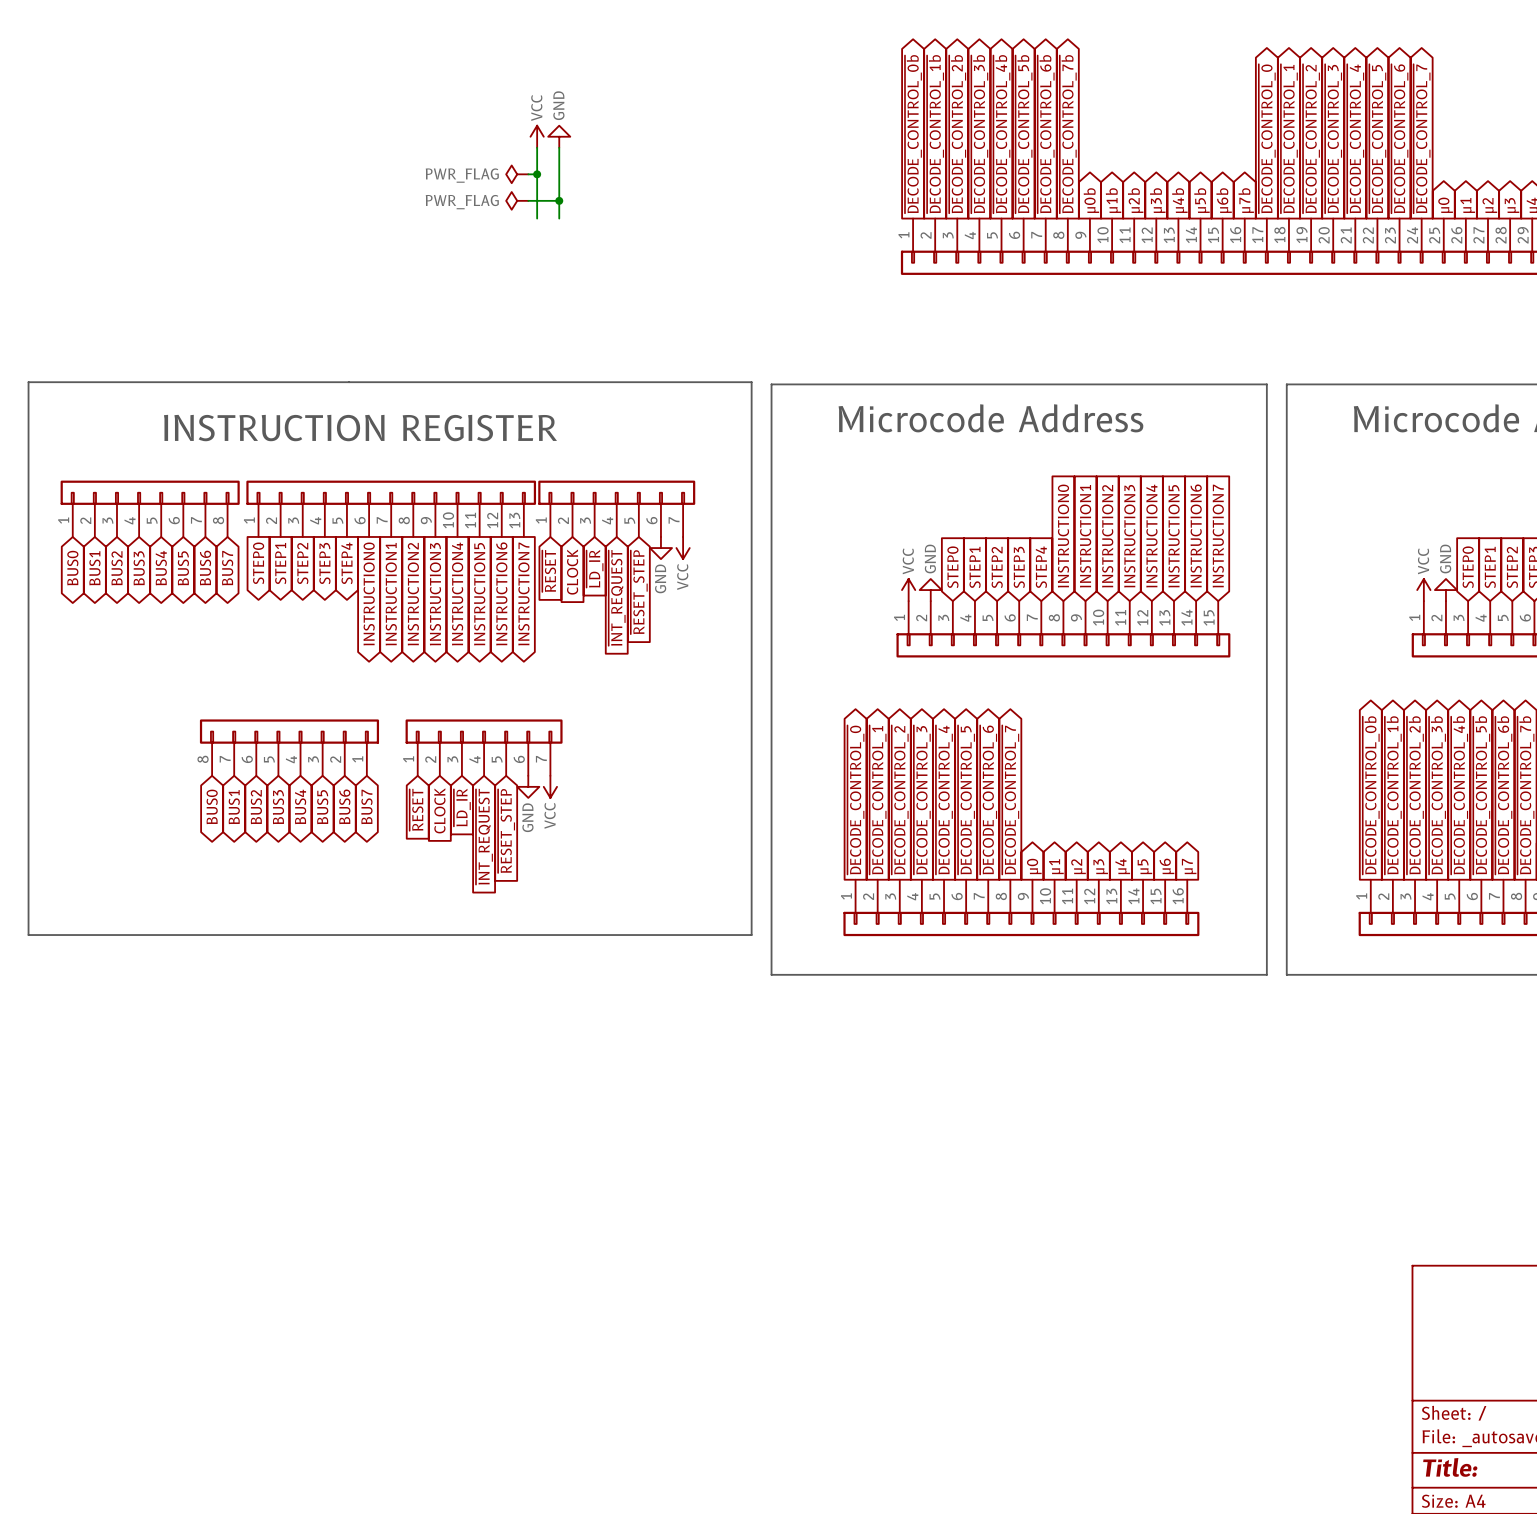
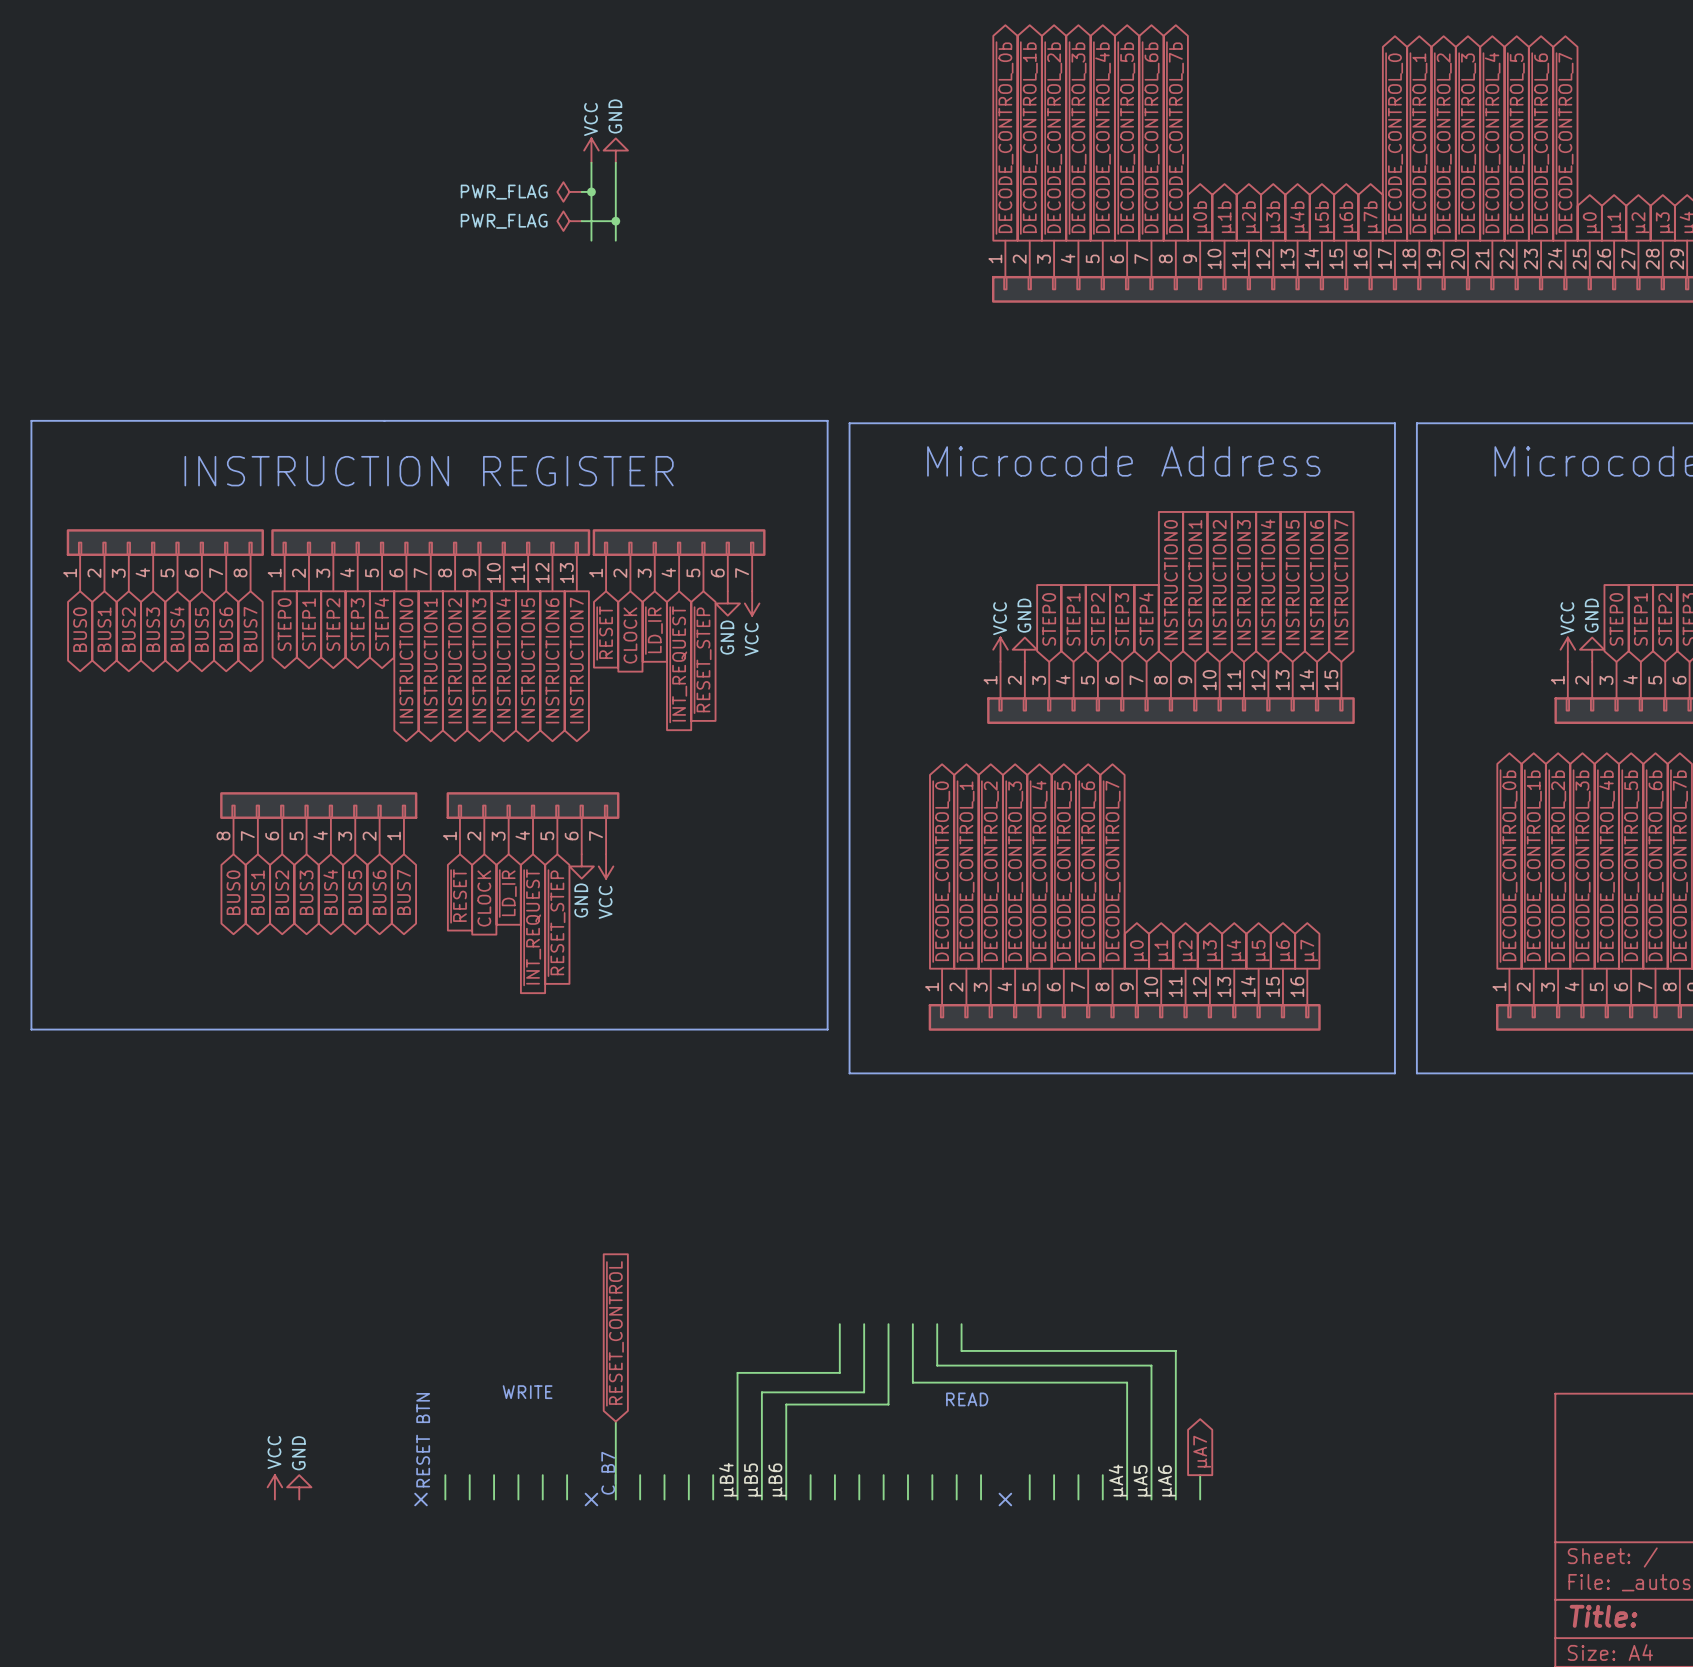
wire: none -> (839, 1324) (839, 1372) (737, 1372) (737, 1499)
wire: none -> (864, 1324) (864, 1392) (761, 1392) (761, 1499)
wire: none -> (888, 1324) (888, 1404) (786, 1404) (786, 1499)
wire: none -> (912, 1324) (912, 1382) (1127, 1382) (1127, 1499)
wire: none -> (937, 1324) (937, 1365) (1151, 1365) (1151, 1499)
wire: none -> (961, 1324) (961, 1350) (1175, 1350) (1175, 1499)
global label: none -> ~{RESET_CONTROL} (614, 1333)
text: none -> WRITE (527, 1392)
text: none -> READ (967, 1399)
wire: none -> (615, 1421) (615, 1499)
text: none -> RESET BTN (423, 1440)
global label: none -> μA7 (1202, 1451)
wire: none -> (445, 1475) (445, 1499)
wire: none -> (469, 1475) (469, 1499)
wire: none -> (494, 1475) (494, 1499)
wire: none -> (518, 1475) (518, 1499)
wire: none -> (542, 1475) (542, 1499)
wire: none -> (567, 1475) (567, 1499)
wire: none -> (640, 1475) (640, 1499)
wire: none -> (664, 1475) (664, 1499)
wire: none -> (688, 1475) (688, 1499)
wire: none -> (713, 1475) (713, 1499)
wire: none -> (810, 1475) (810, 1499)
wire: none -> (834, 1475) (834, 1499)
wire: none -> (859, 1475) (859, 1499)
wire: none -> (883, 1475) (883, 1499)
wire: none -> (907, 1475) (907, 1499)
wire: none -> (932, 1475) (932, 1499)
wire: none -> (956, 1475) (956, 1499)
wire: none -> (981, 1475) (981, 1499)
wire: none -> (1029, 1475) (1029, 1499)
wire: none -> (1054, 1475) (1054, 1499)
wire: none -> (1078, 1475) (1078, 1499)
wire: none -> (1102, 1475) (1102, 1499)
wire: none -> (1200, 1475) (1200, 1499)
text: none -> C_B7 (608, 1473)
label: none -> μB4 (728, 1479)
label: none -> μB6 (777, 1479)
label: none -> μA4 (1118, 1480)
label: none -> μA6 (1166, 1480)
label: none -> μB5 (753, 1479)
label: none -> μA5 (1142, 1480)
power symbol: none -> VCC (274, 1487)
power symbol: none -> GND (299, 1487)
no-connect mark: none -> (421, 1499)
no-connect mark: none -> (591, 1499)
no-connect mark: none -> (1005, 1499)

